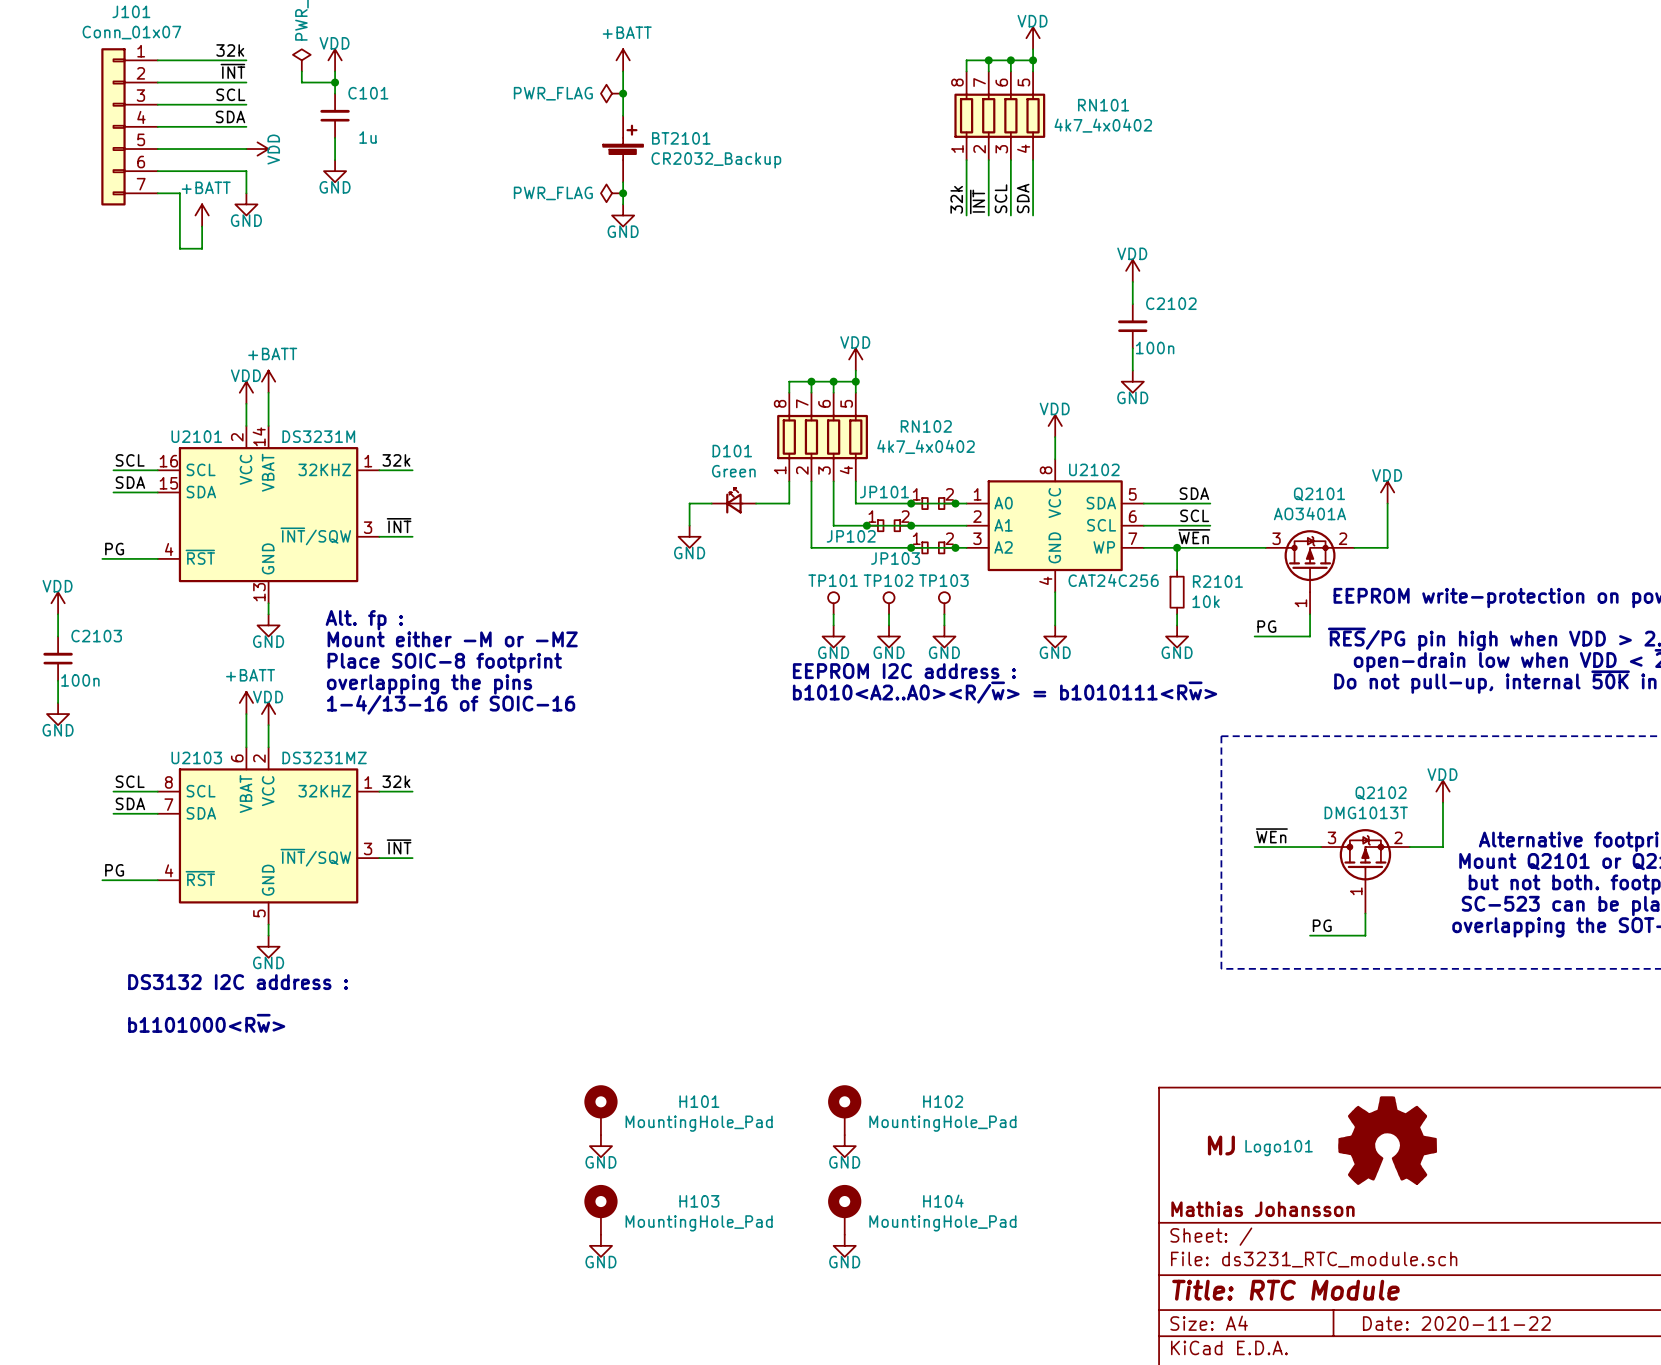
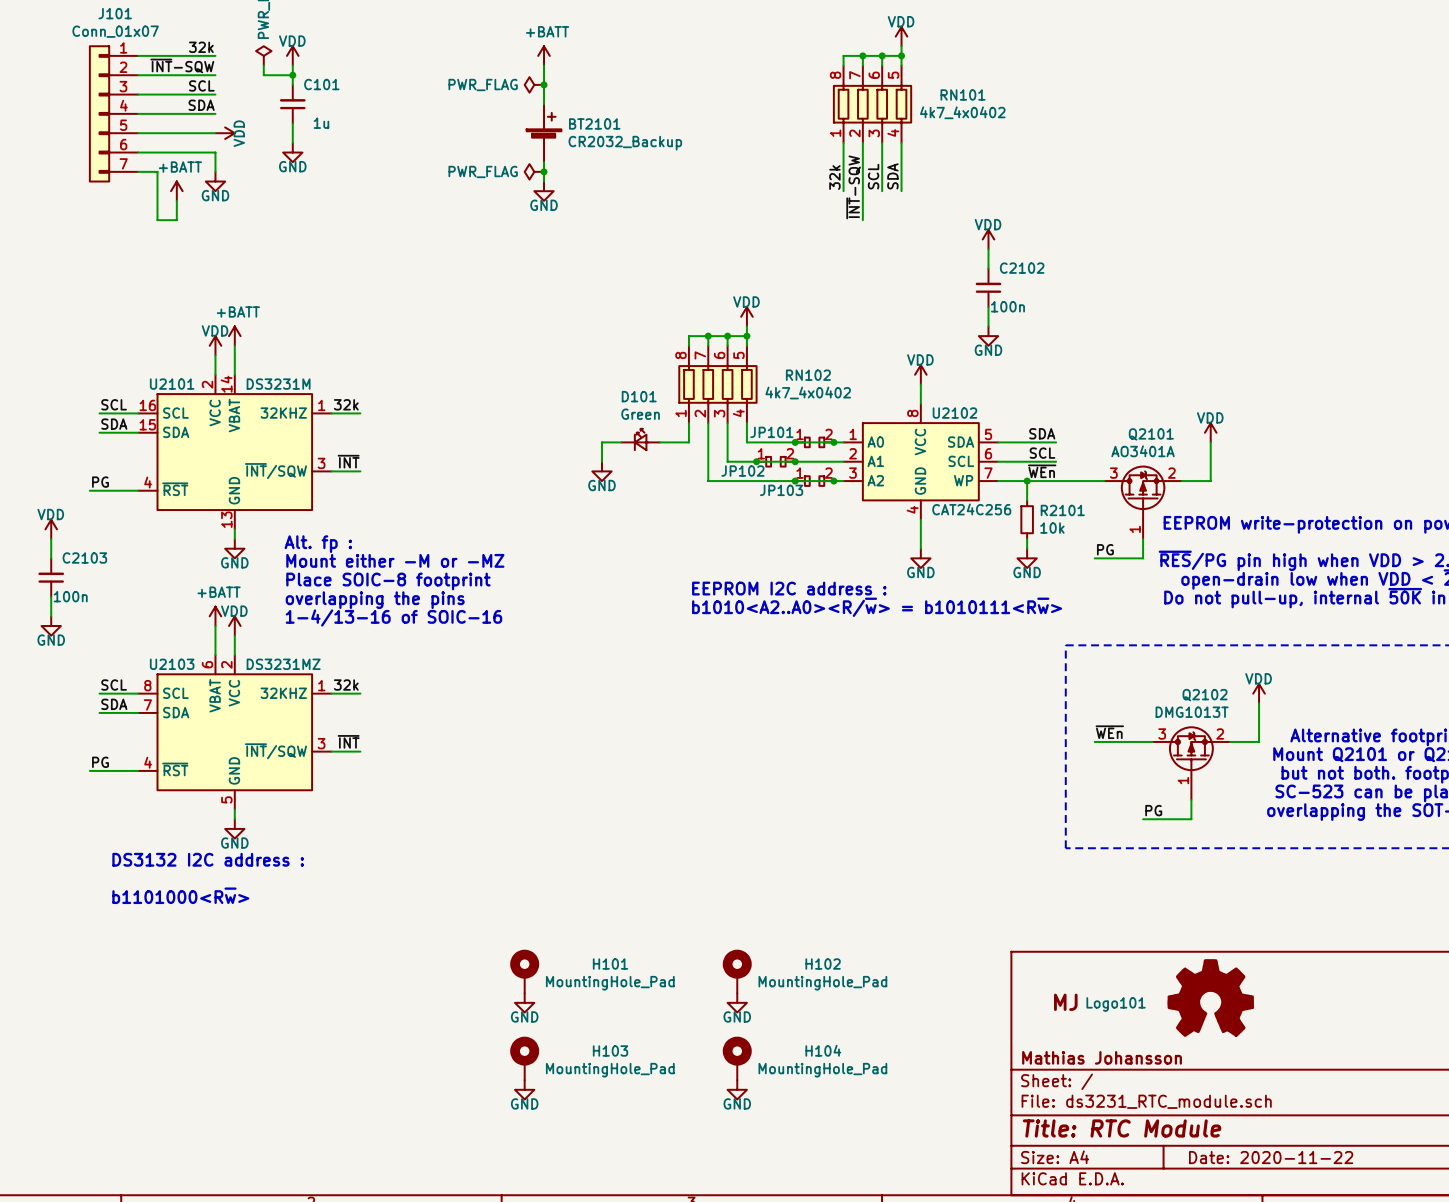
label: ~{INT} (232, 71) -> ~{INT}-SQW (182, 65)
label: ~{INT} (977, 201) -> ~{INT}-SQW (853, 187)
wire: none -> (862, 191) (862, 220)
TP101: (833, 603) -> none
TP102: (889, 603) -> none
TP103: (944, 603) -> none
wire: (833, 614) (833, 625) -> none
wire: (889, 614) (889, 625) -> none
wire: (944, 614) (944, 625) -> none
power symbol: GND (833, 636) -> none
power symbol: GND (889, 636) -> none
power symbol: GND (944, 636) -> none

